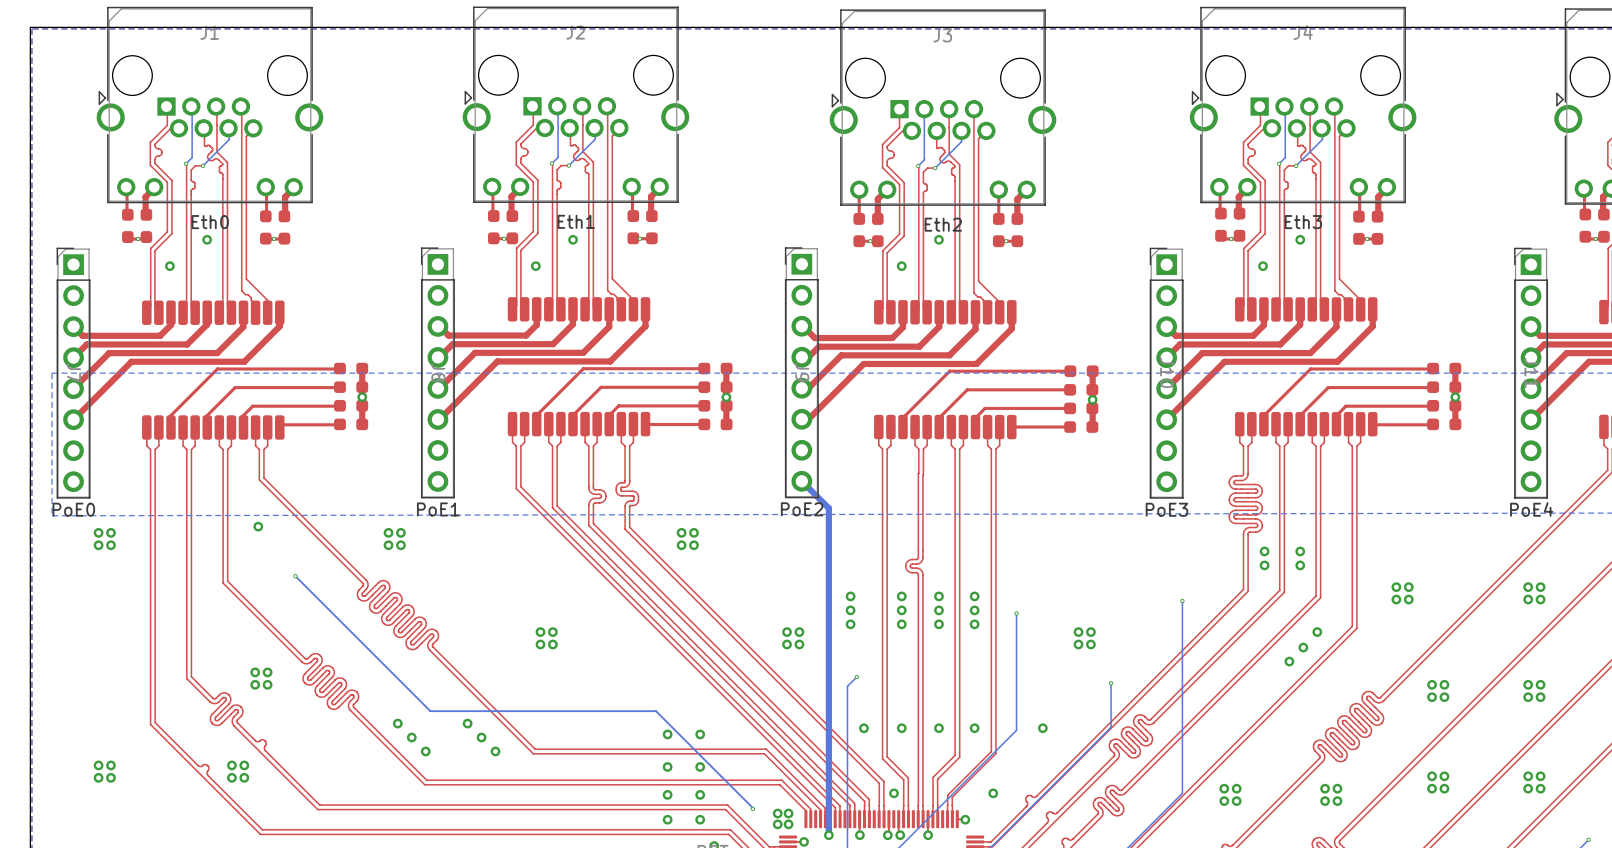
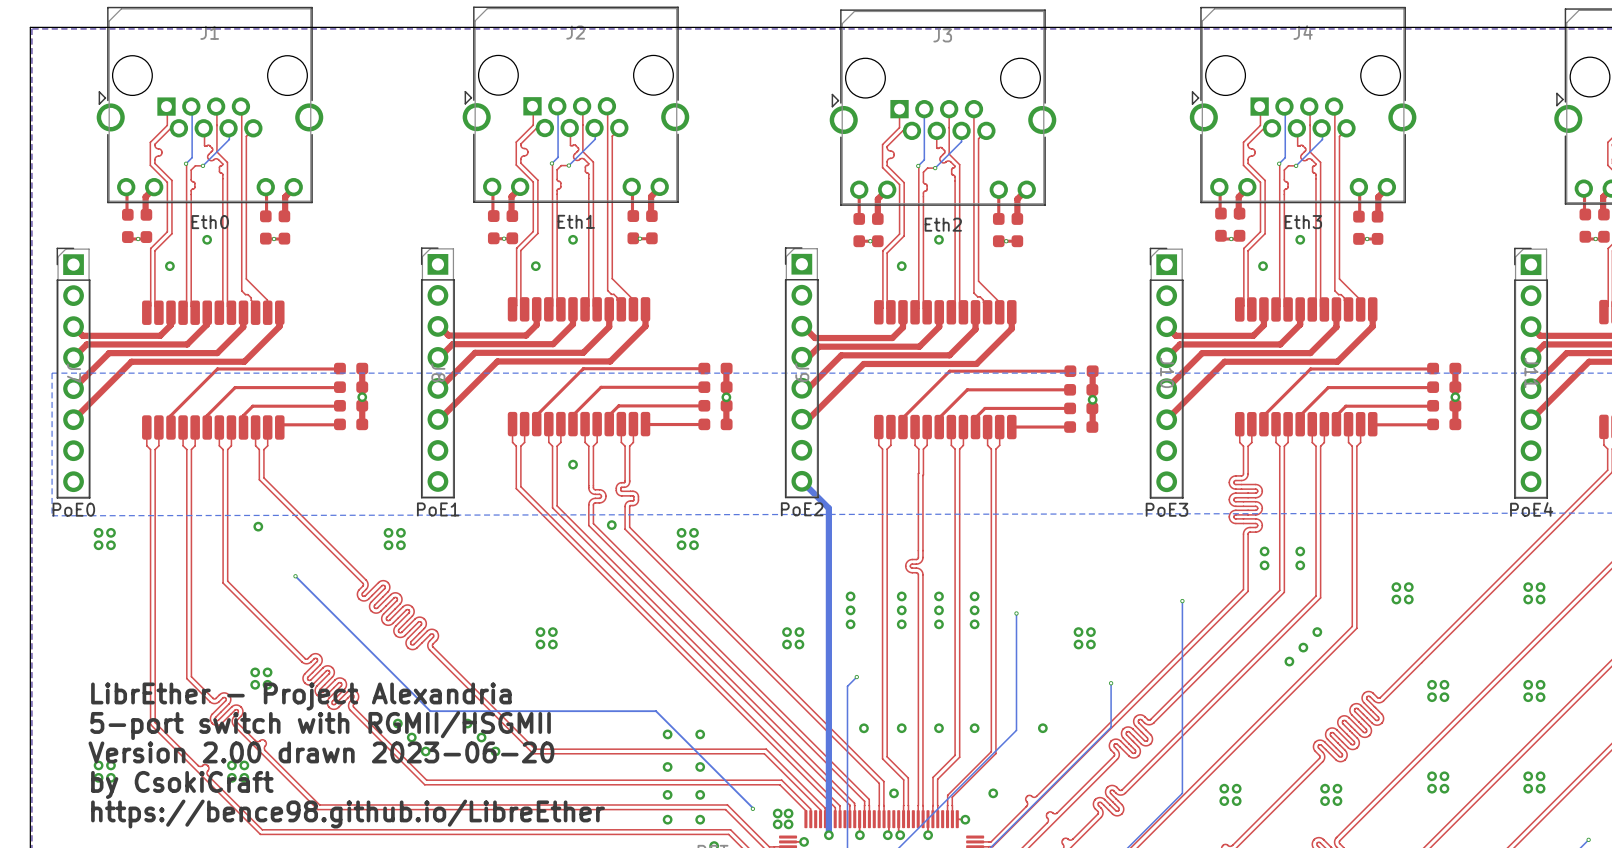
via: none -> (573, 464)
via: none -> (611, 525)
text: none -> LibrEther - Project Alexandria (301, 696)
text: none -> 5-port switch with RGMII/HSGMII (320, 725)
text: none -> Version 2.00 drawn 2023-06-20 (321, 752)
text: none -> by CsokiCraft (182, 784)
text: none -> https://bence98.github.io/LibreEther (348, 814)

